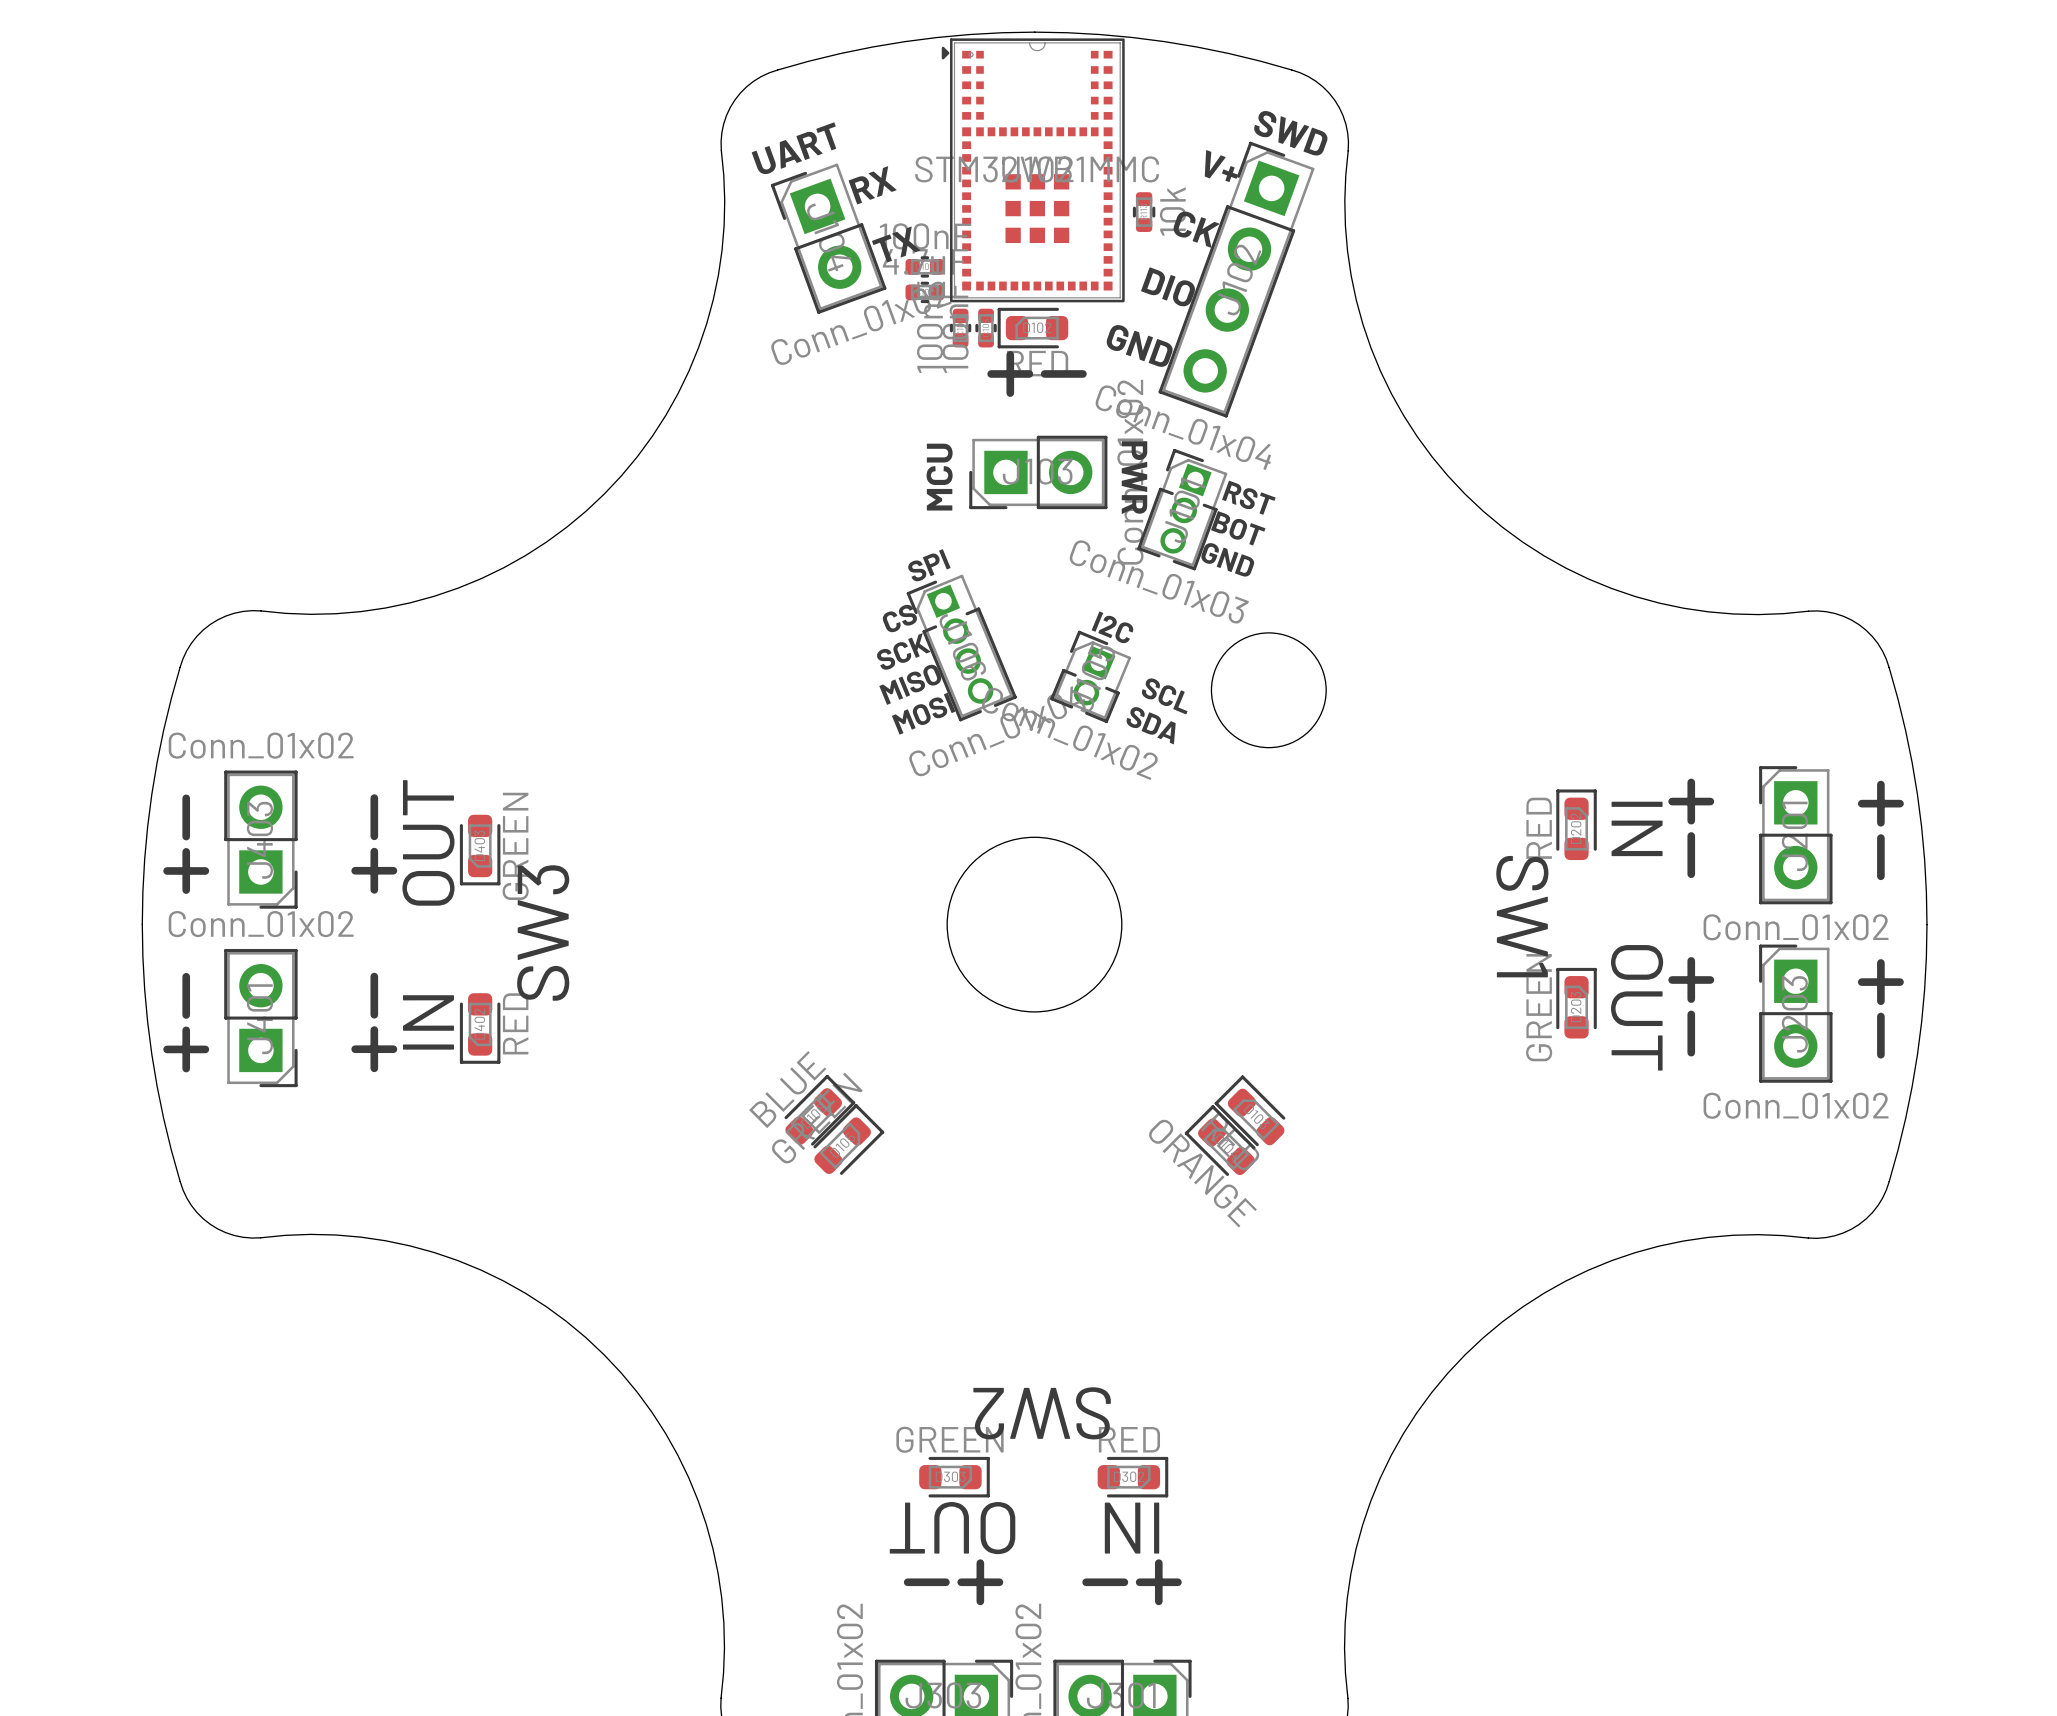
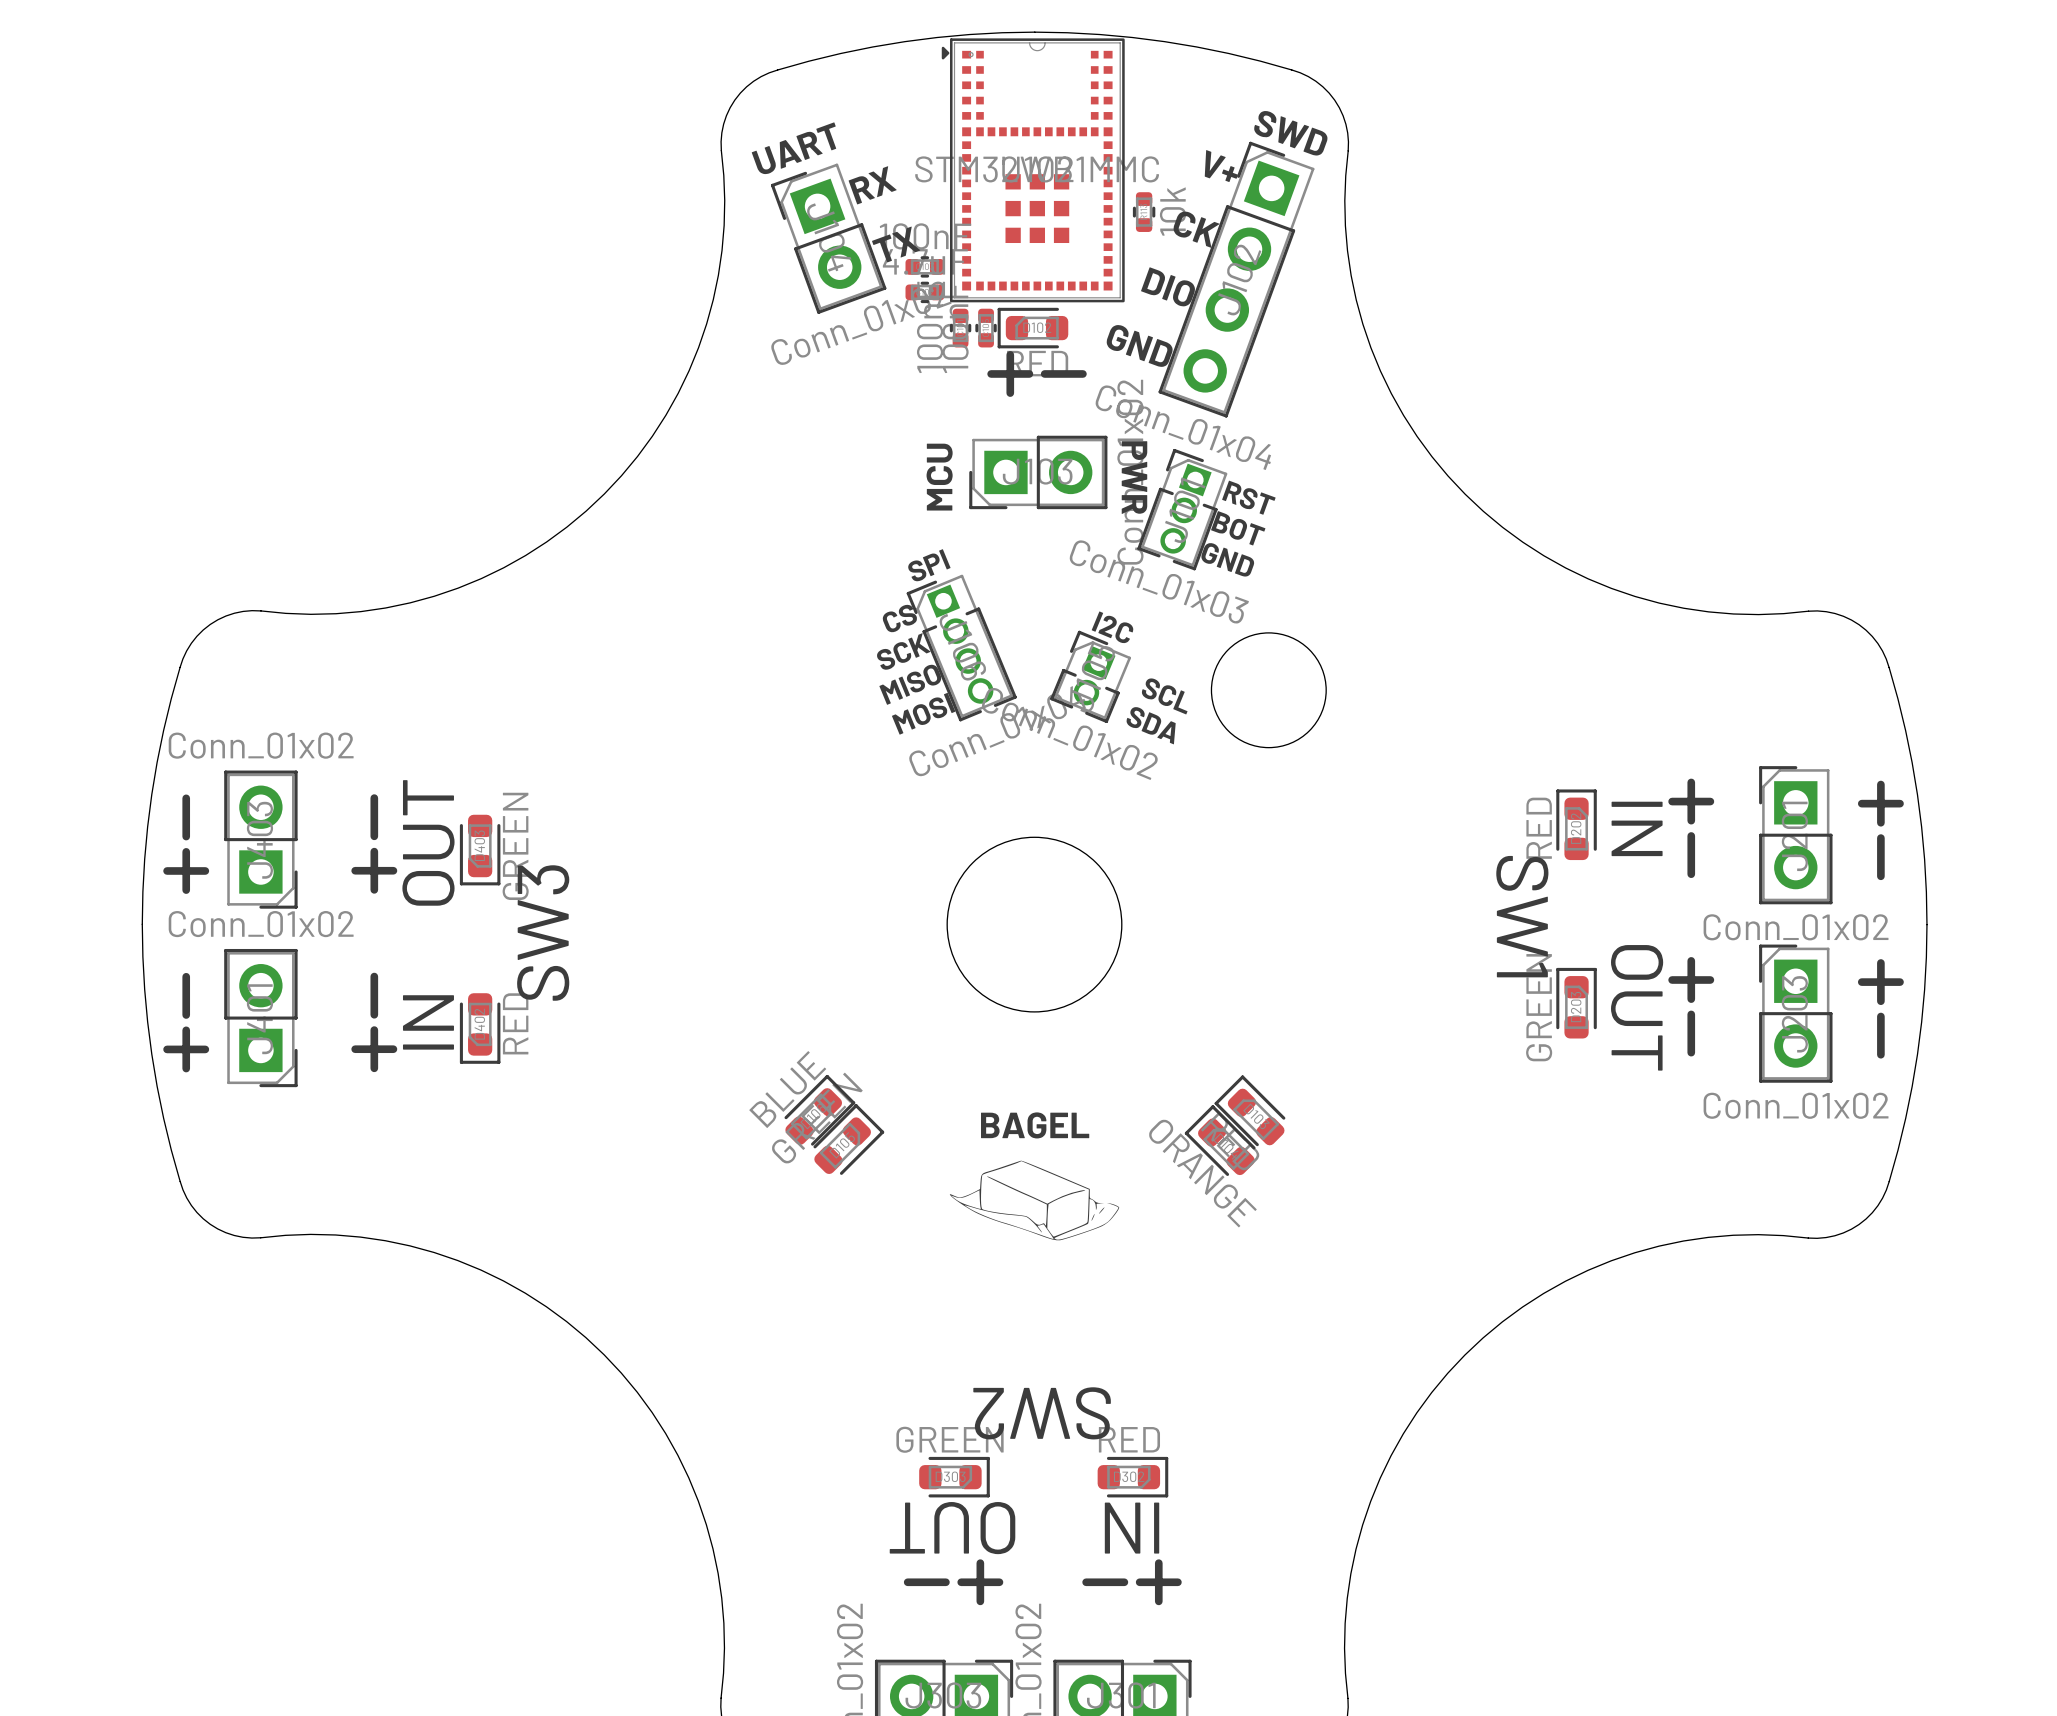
text: none -> BAGEL (1035, 1125)
drawing: none -> [949, 1160, 1120, 1241]

